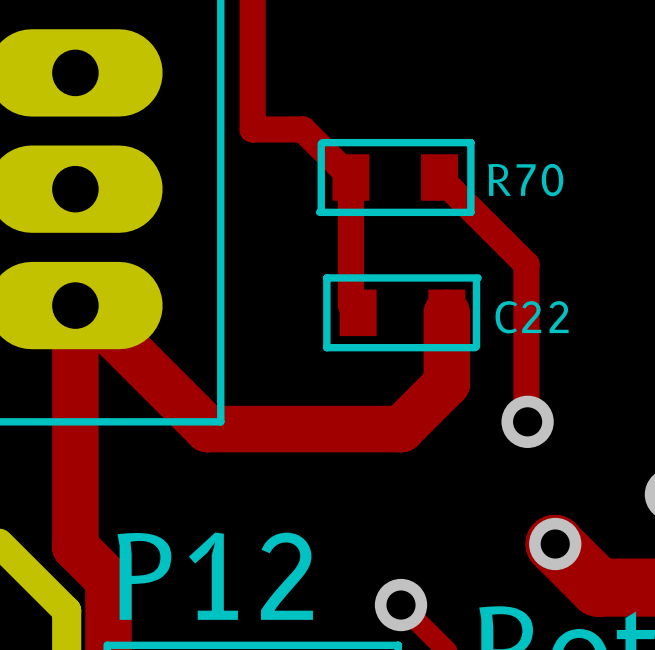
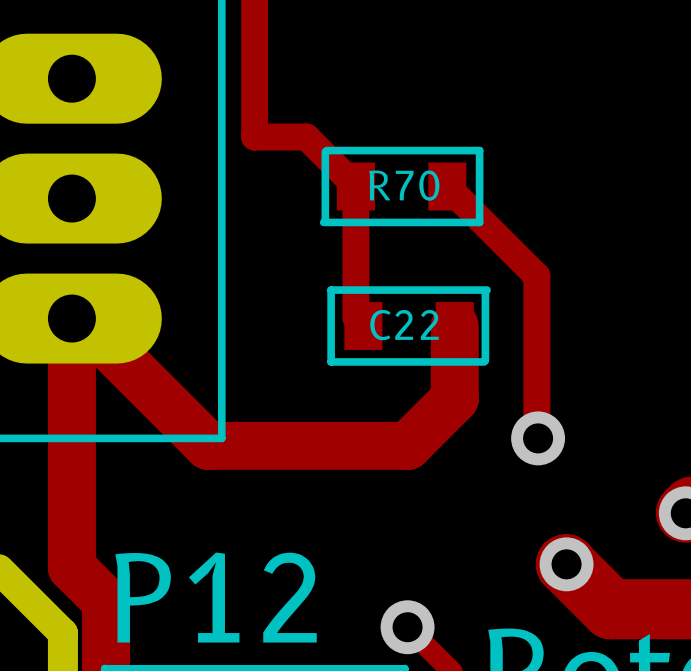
R70 name position: R70 (525, 180) -> R70 (404, 185)
C22 name position: C22 (532, 317) -> C22 (404, 325)

